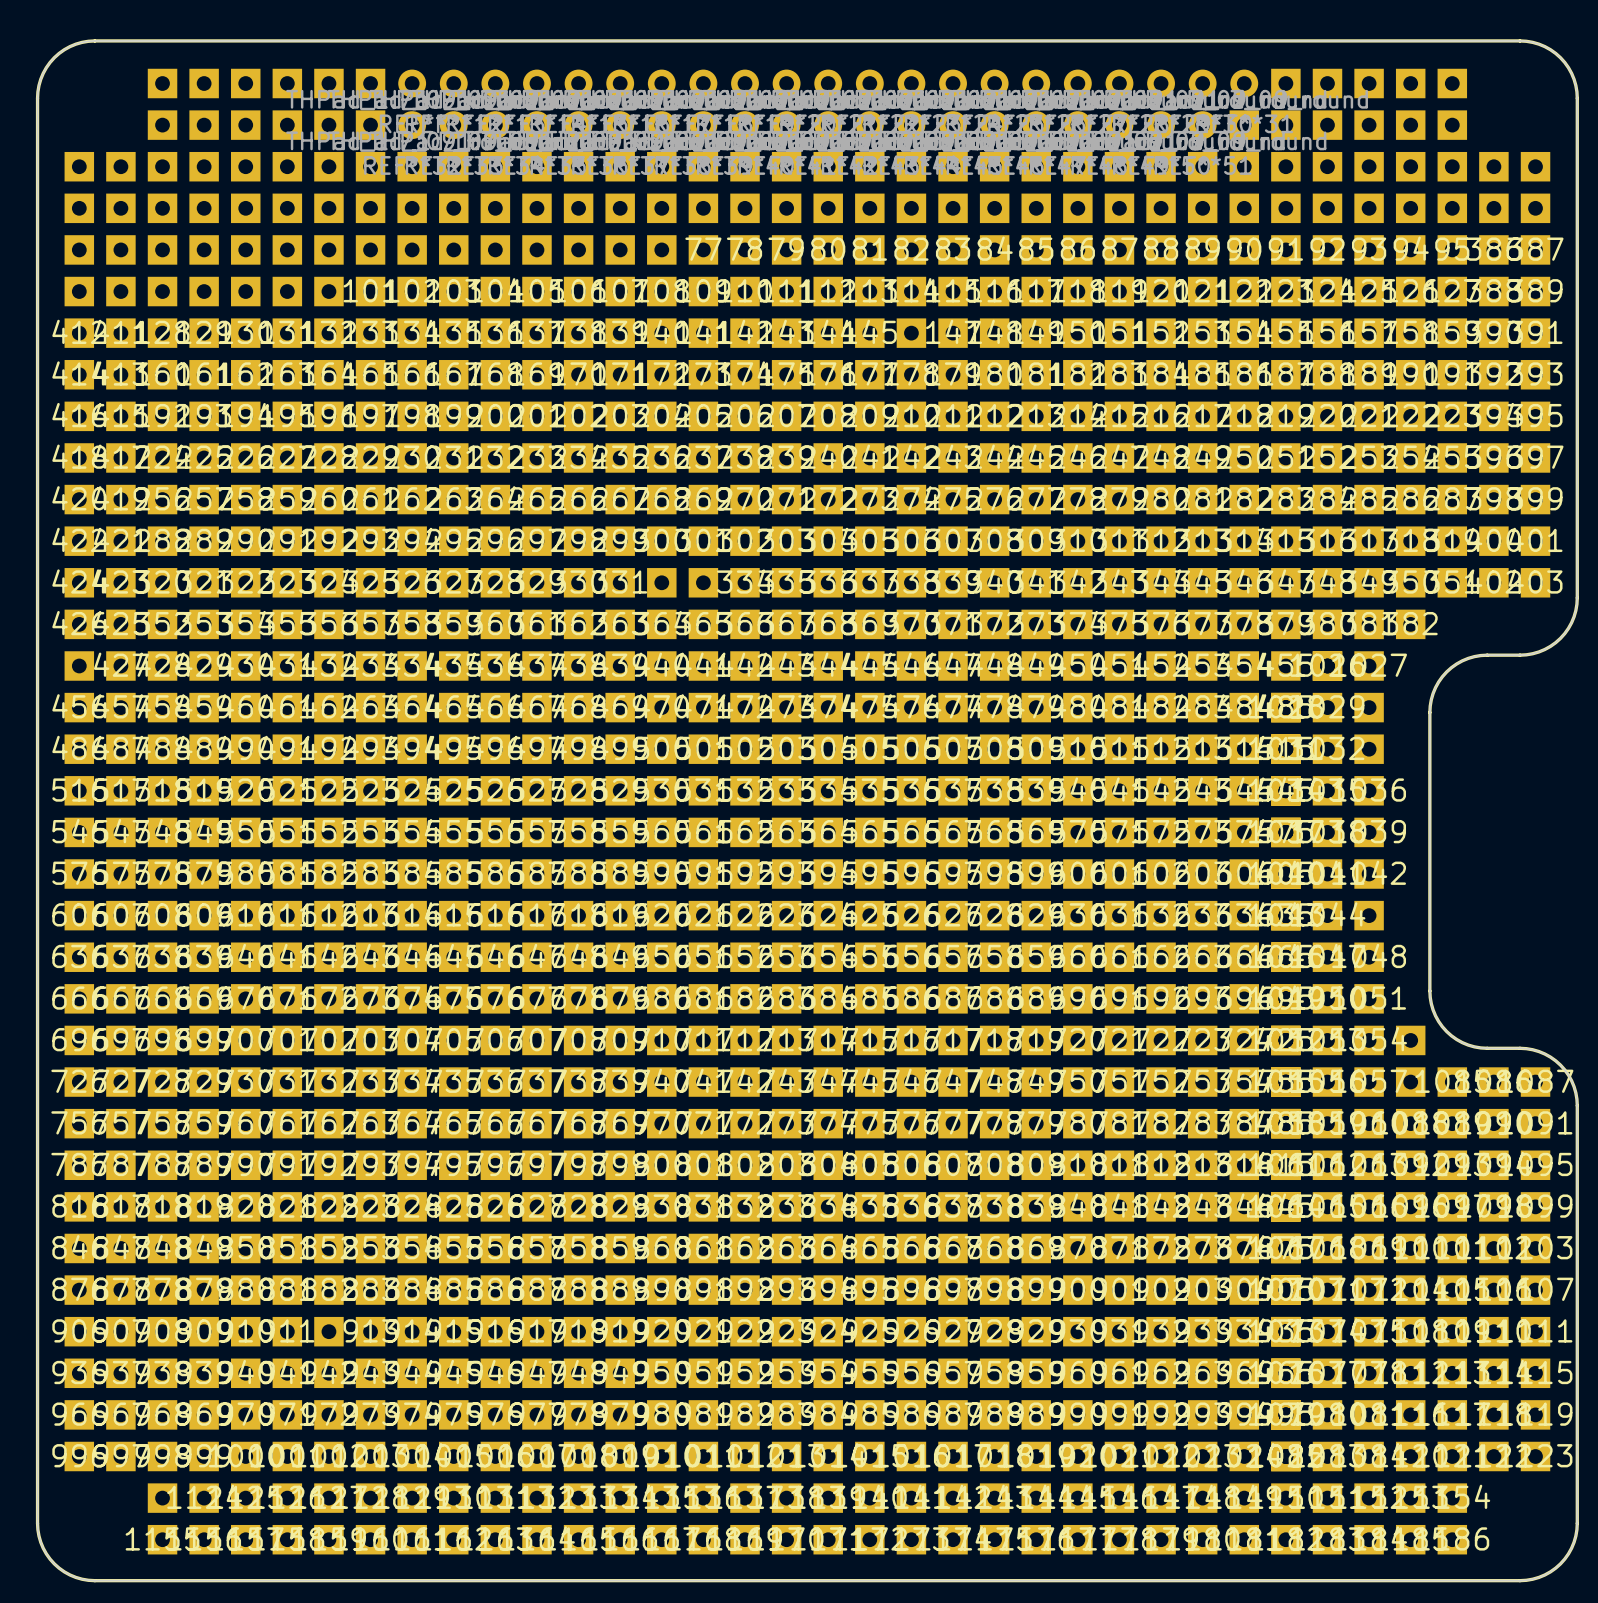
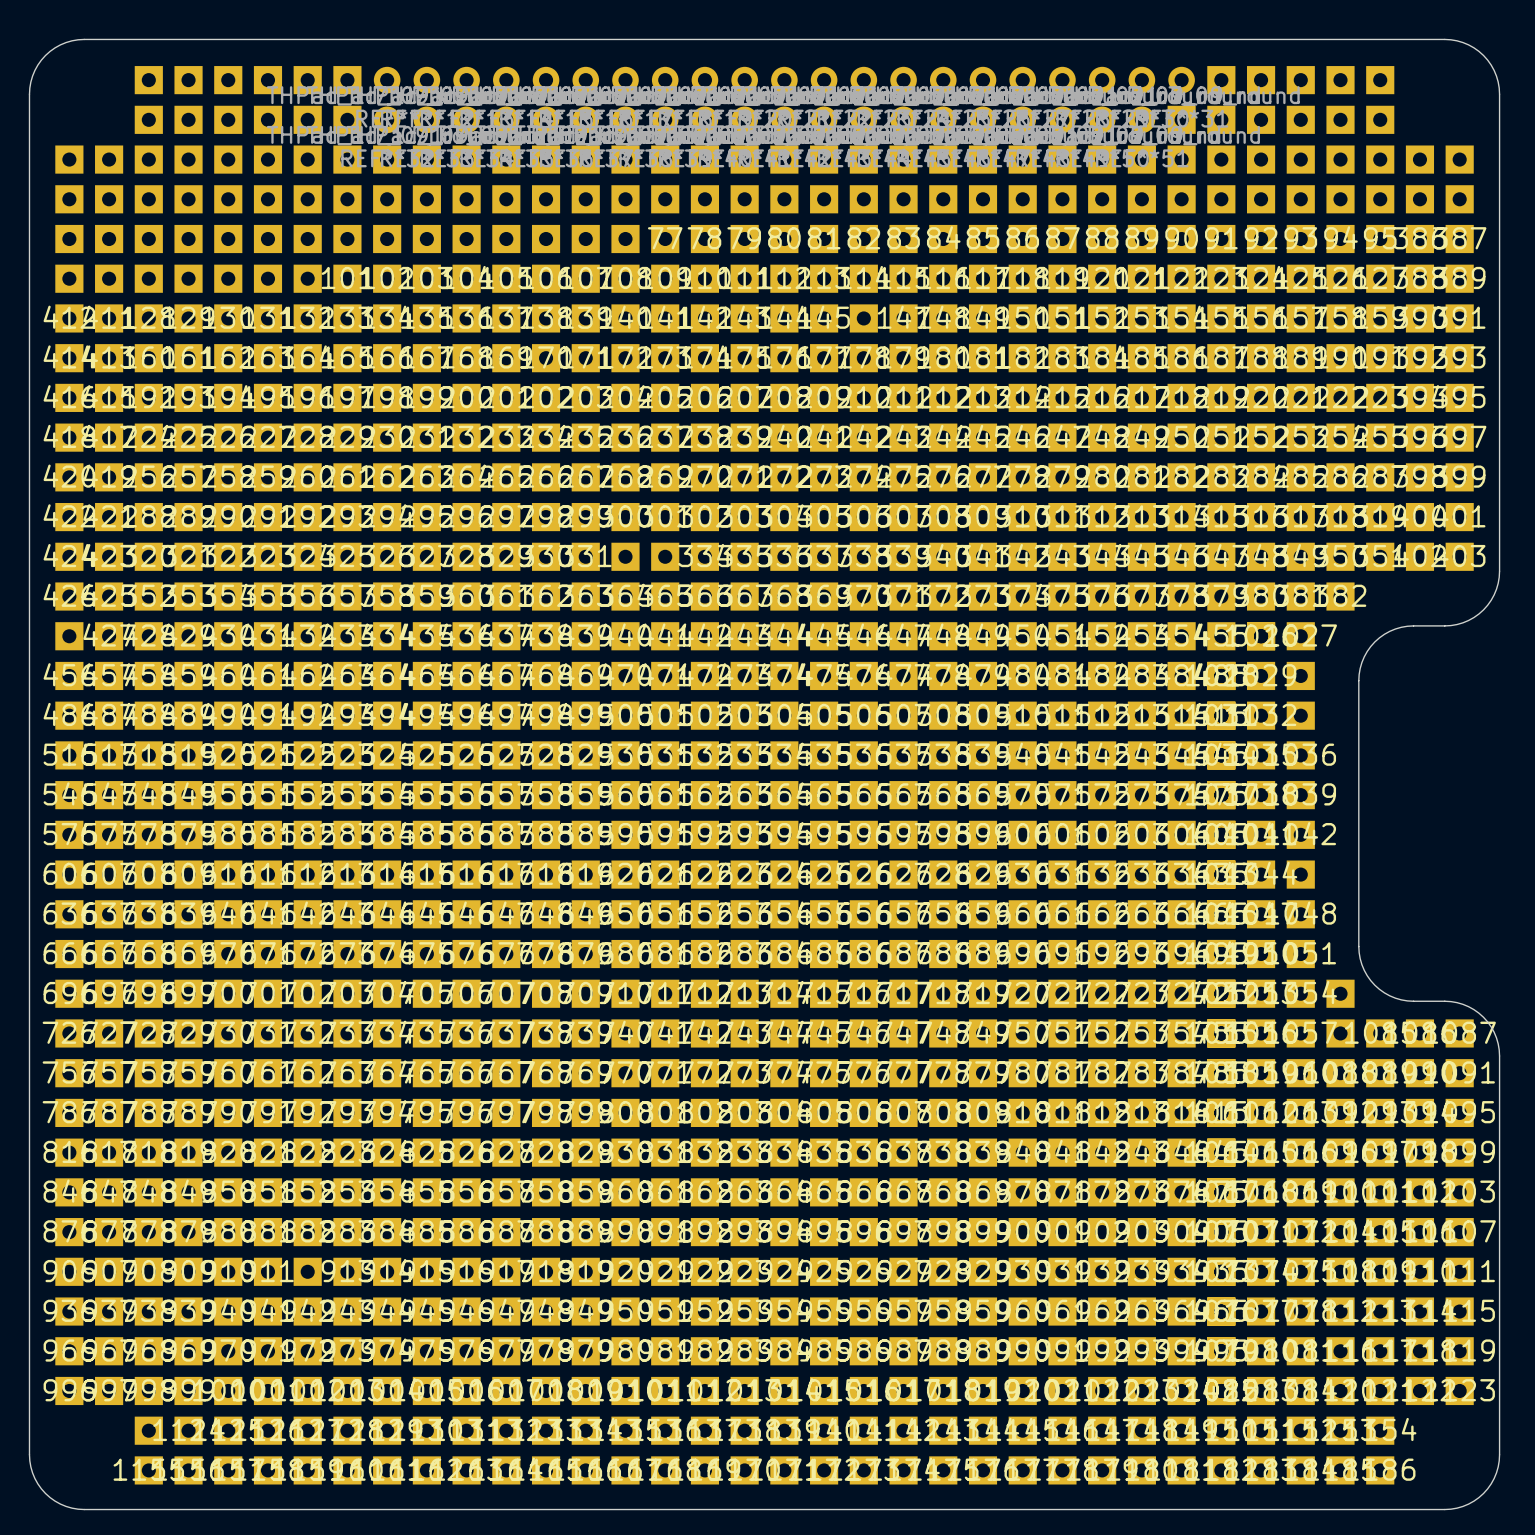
line: (94, 40) (1519, 40) (1538, 44) (1560, 57) (1571, 73) (1577, 98) (1576, 604) (1568, 628) (1550, 646) (1526, 654) (1480, 655) (1468, 658) (1446, 671) (1433, 693) (1429, 712) (1429, 990) (1433, 1009) (1438, 1021) (1456, 1039) (1480, 1047) (1526, 1048) (1544, 1053) (1564, 1069) (1575, 1092) (1577, 1523) (1574, 1542) (1560, 1563) (1538, 1577) (1519, 1580) (94, 1580) (75, 1577) (54, 1563) (40, 1542) (37, 1523) (37, 98) (40, 79) (54, 57) (70, 46) (94, 40) -> none

